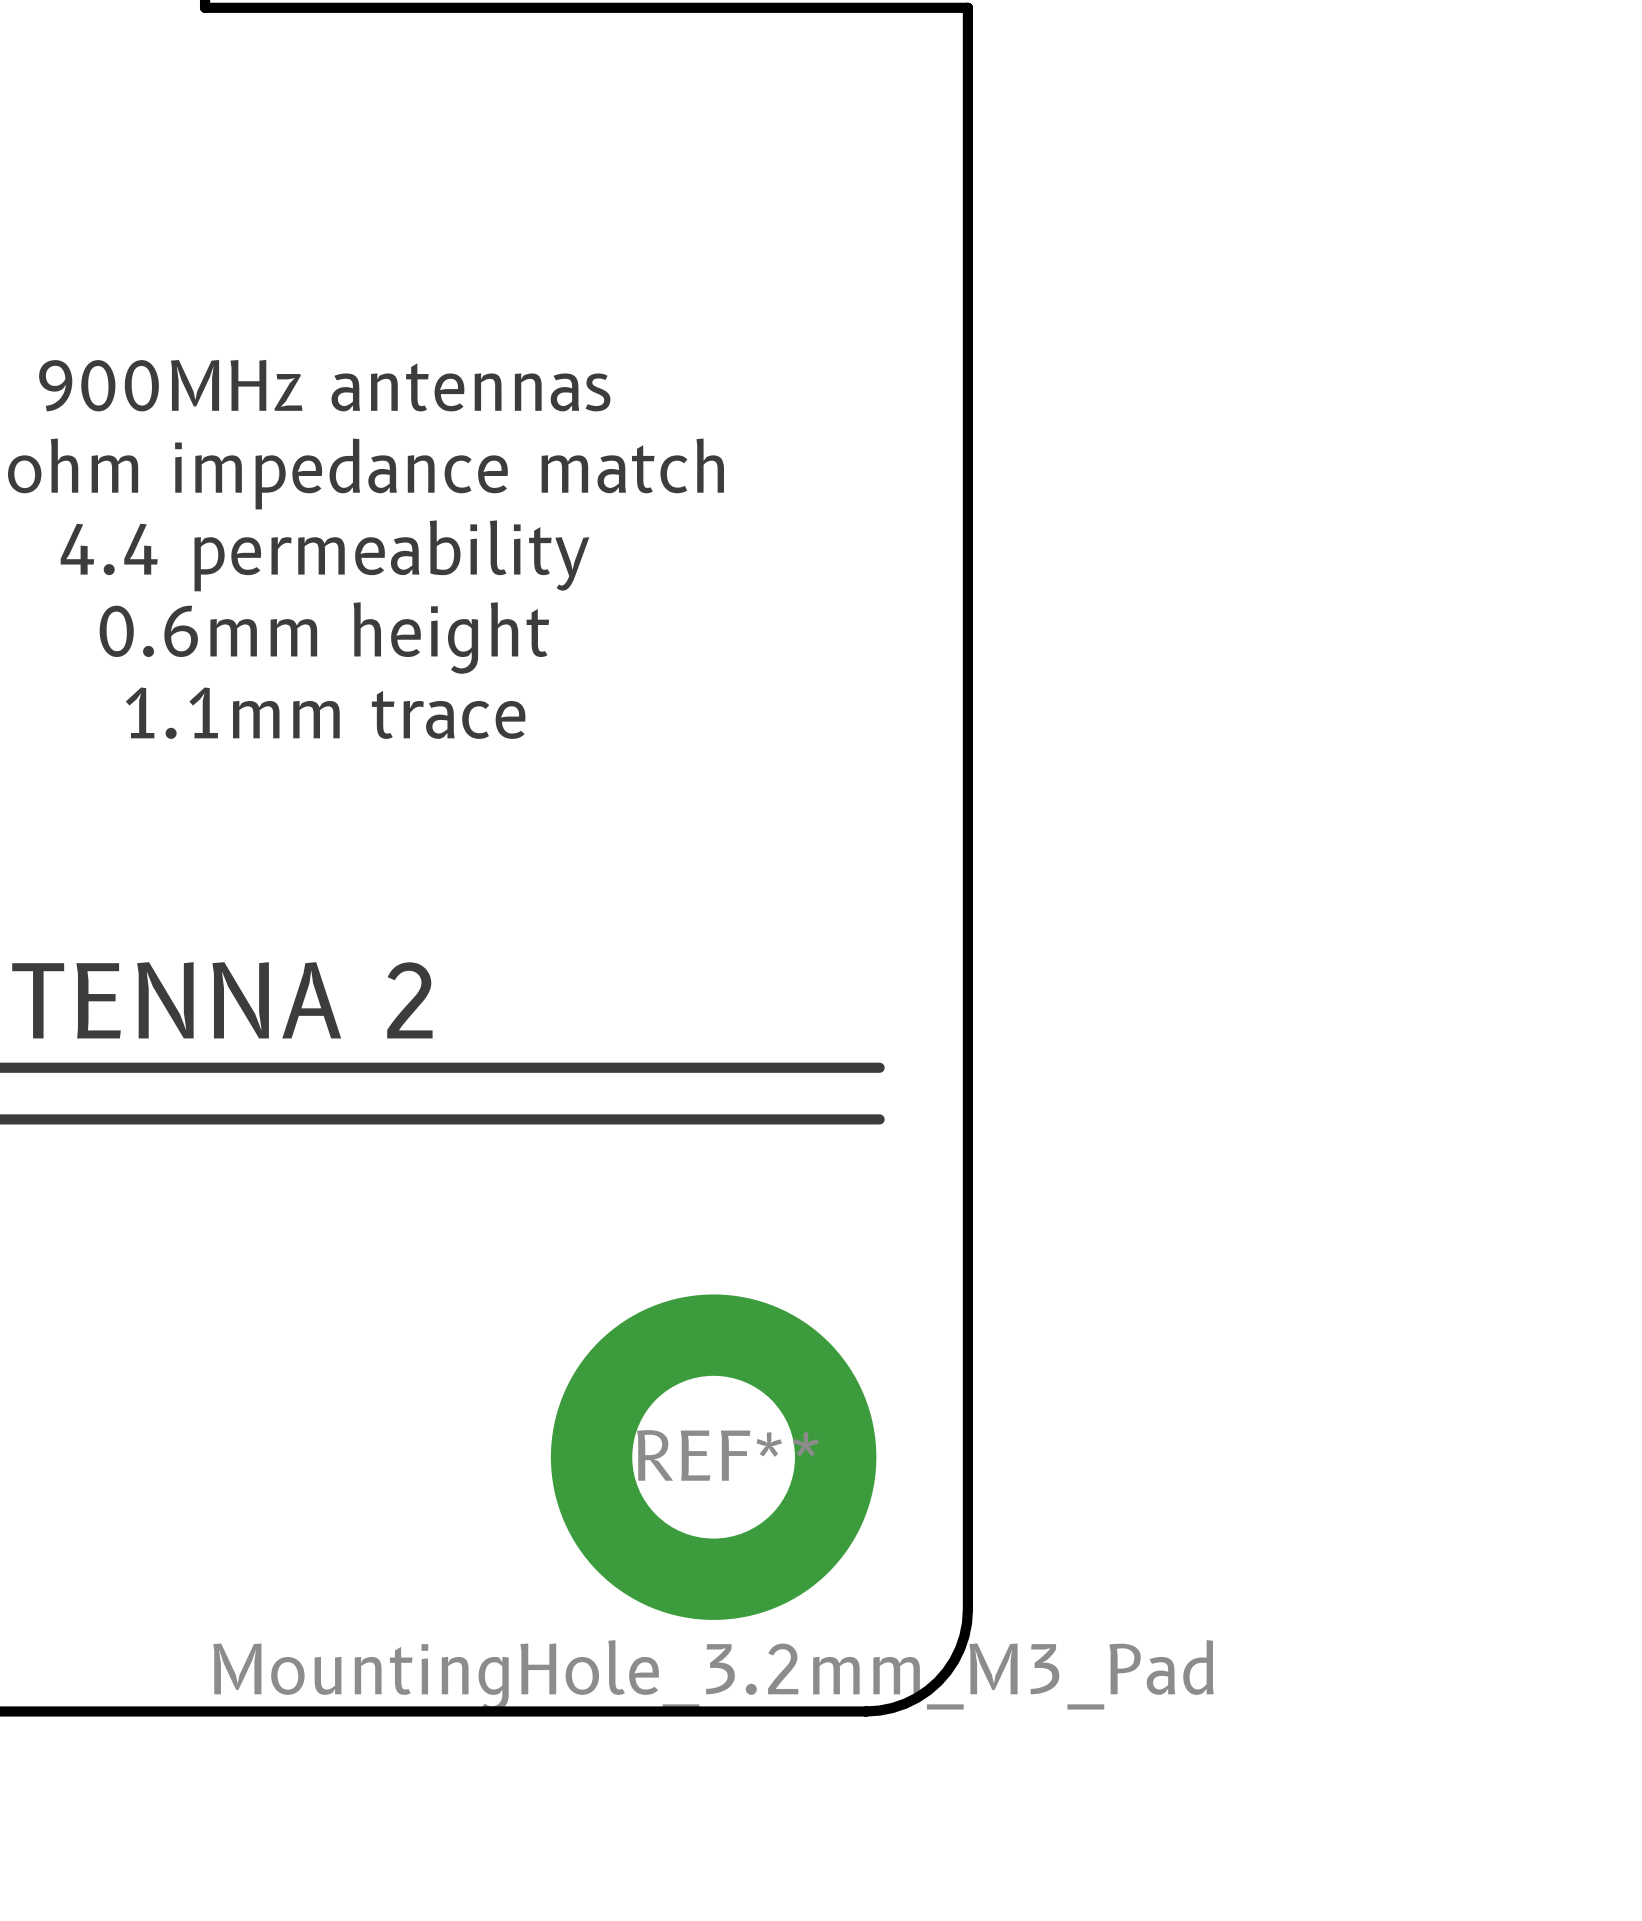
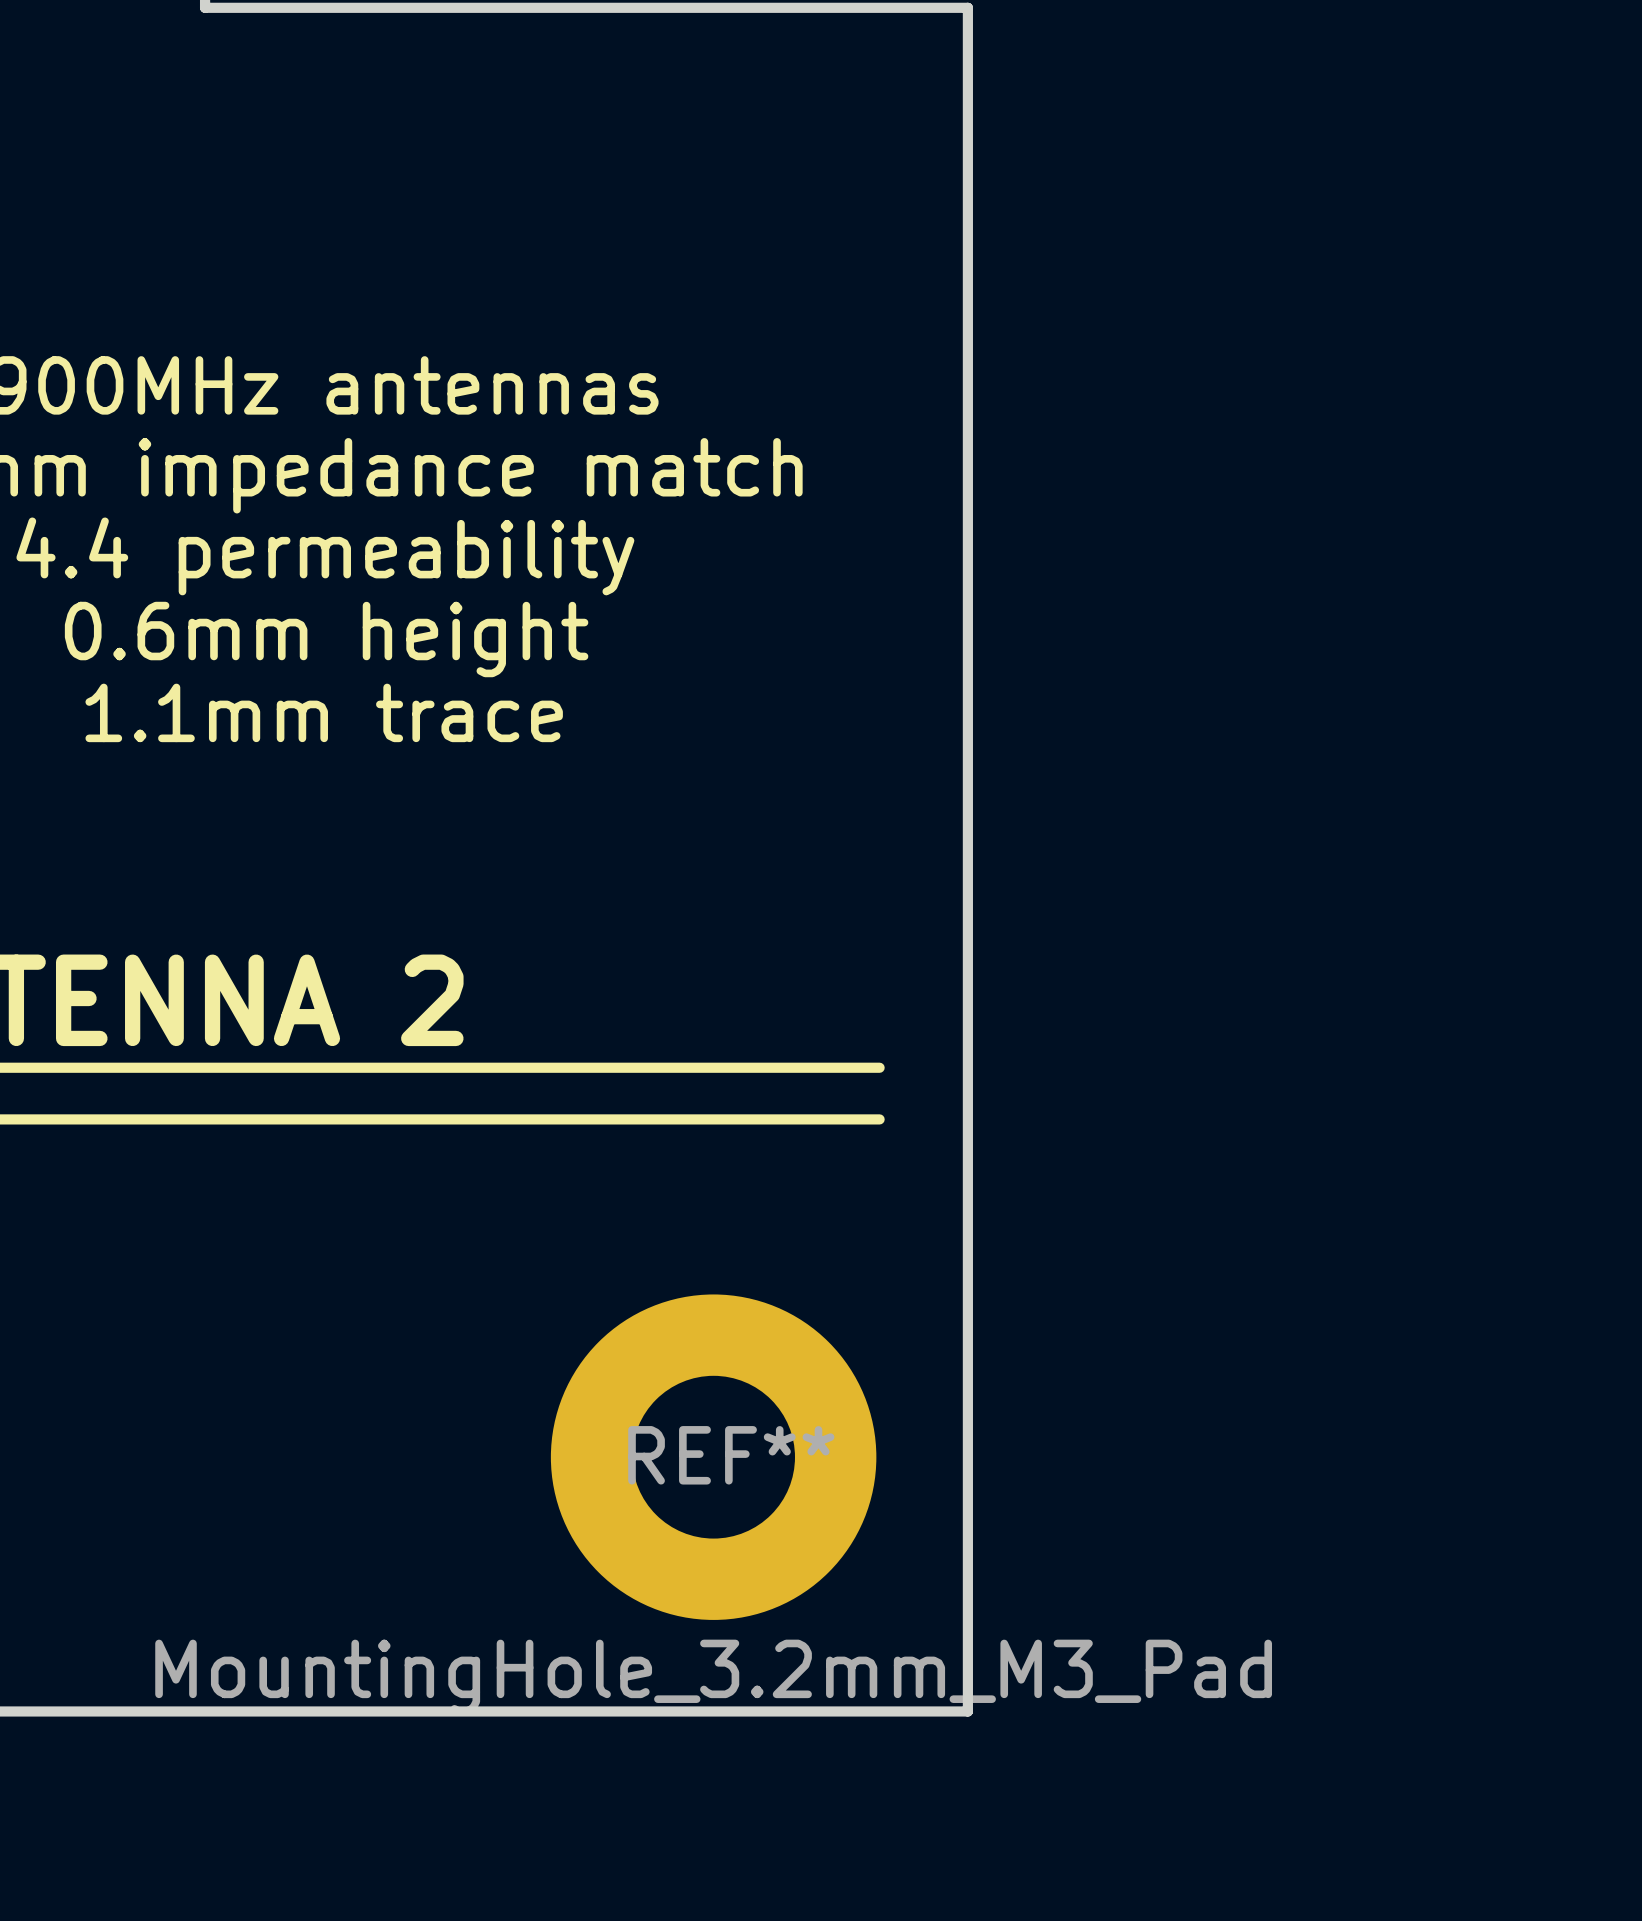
board edge: (967, 1609) (964, 1636) (960, 1648) (954, 1660) (938, 1681) (917, 1697) (905, 1703) (892, 1708) (866, 1711) -> (967, 1609) (967, 1711) (866, 1711)

